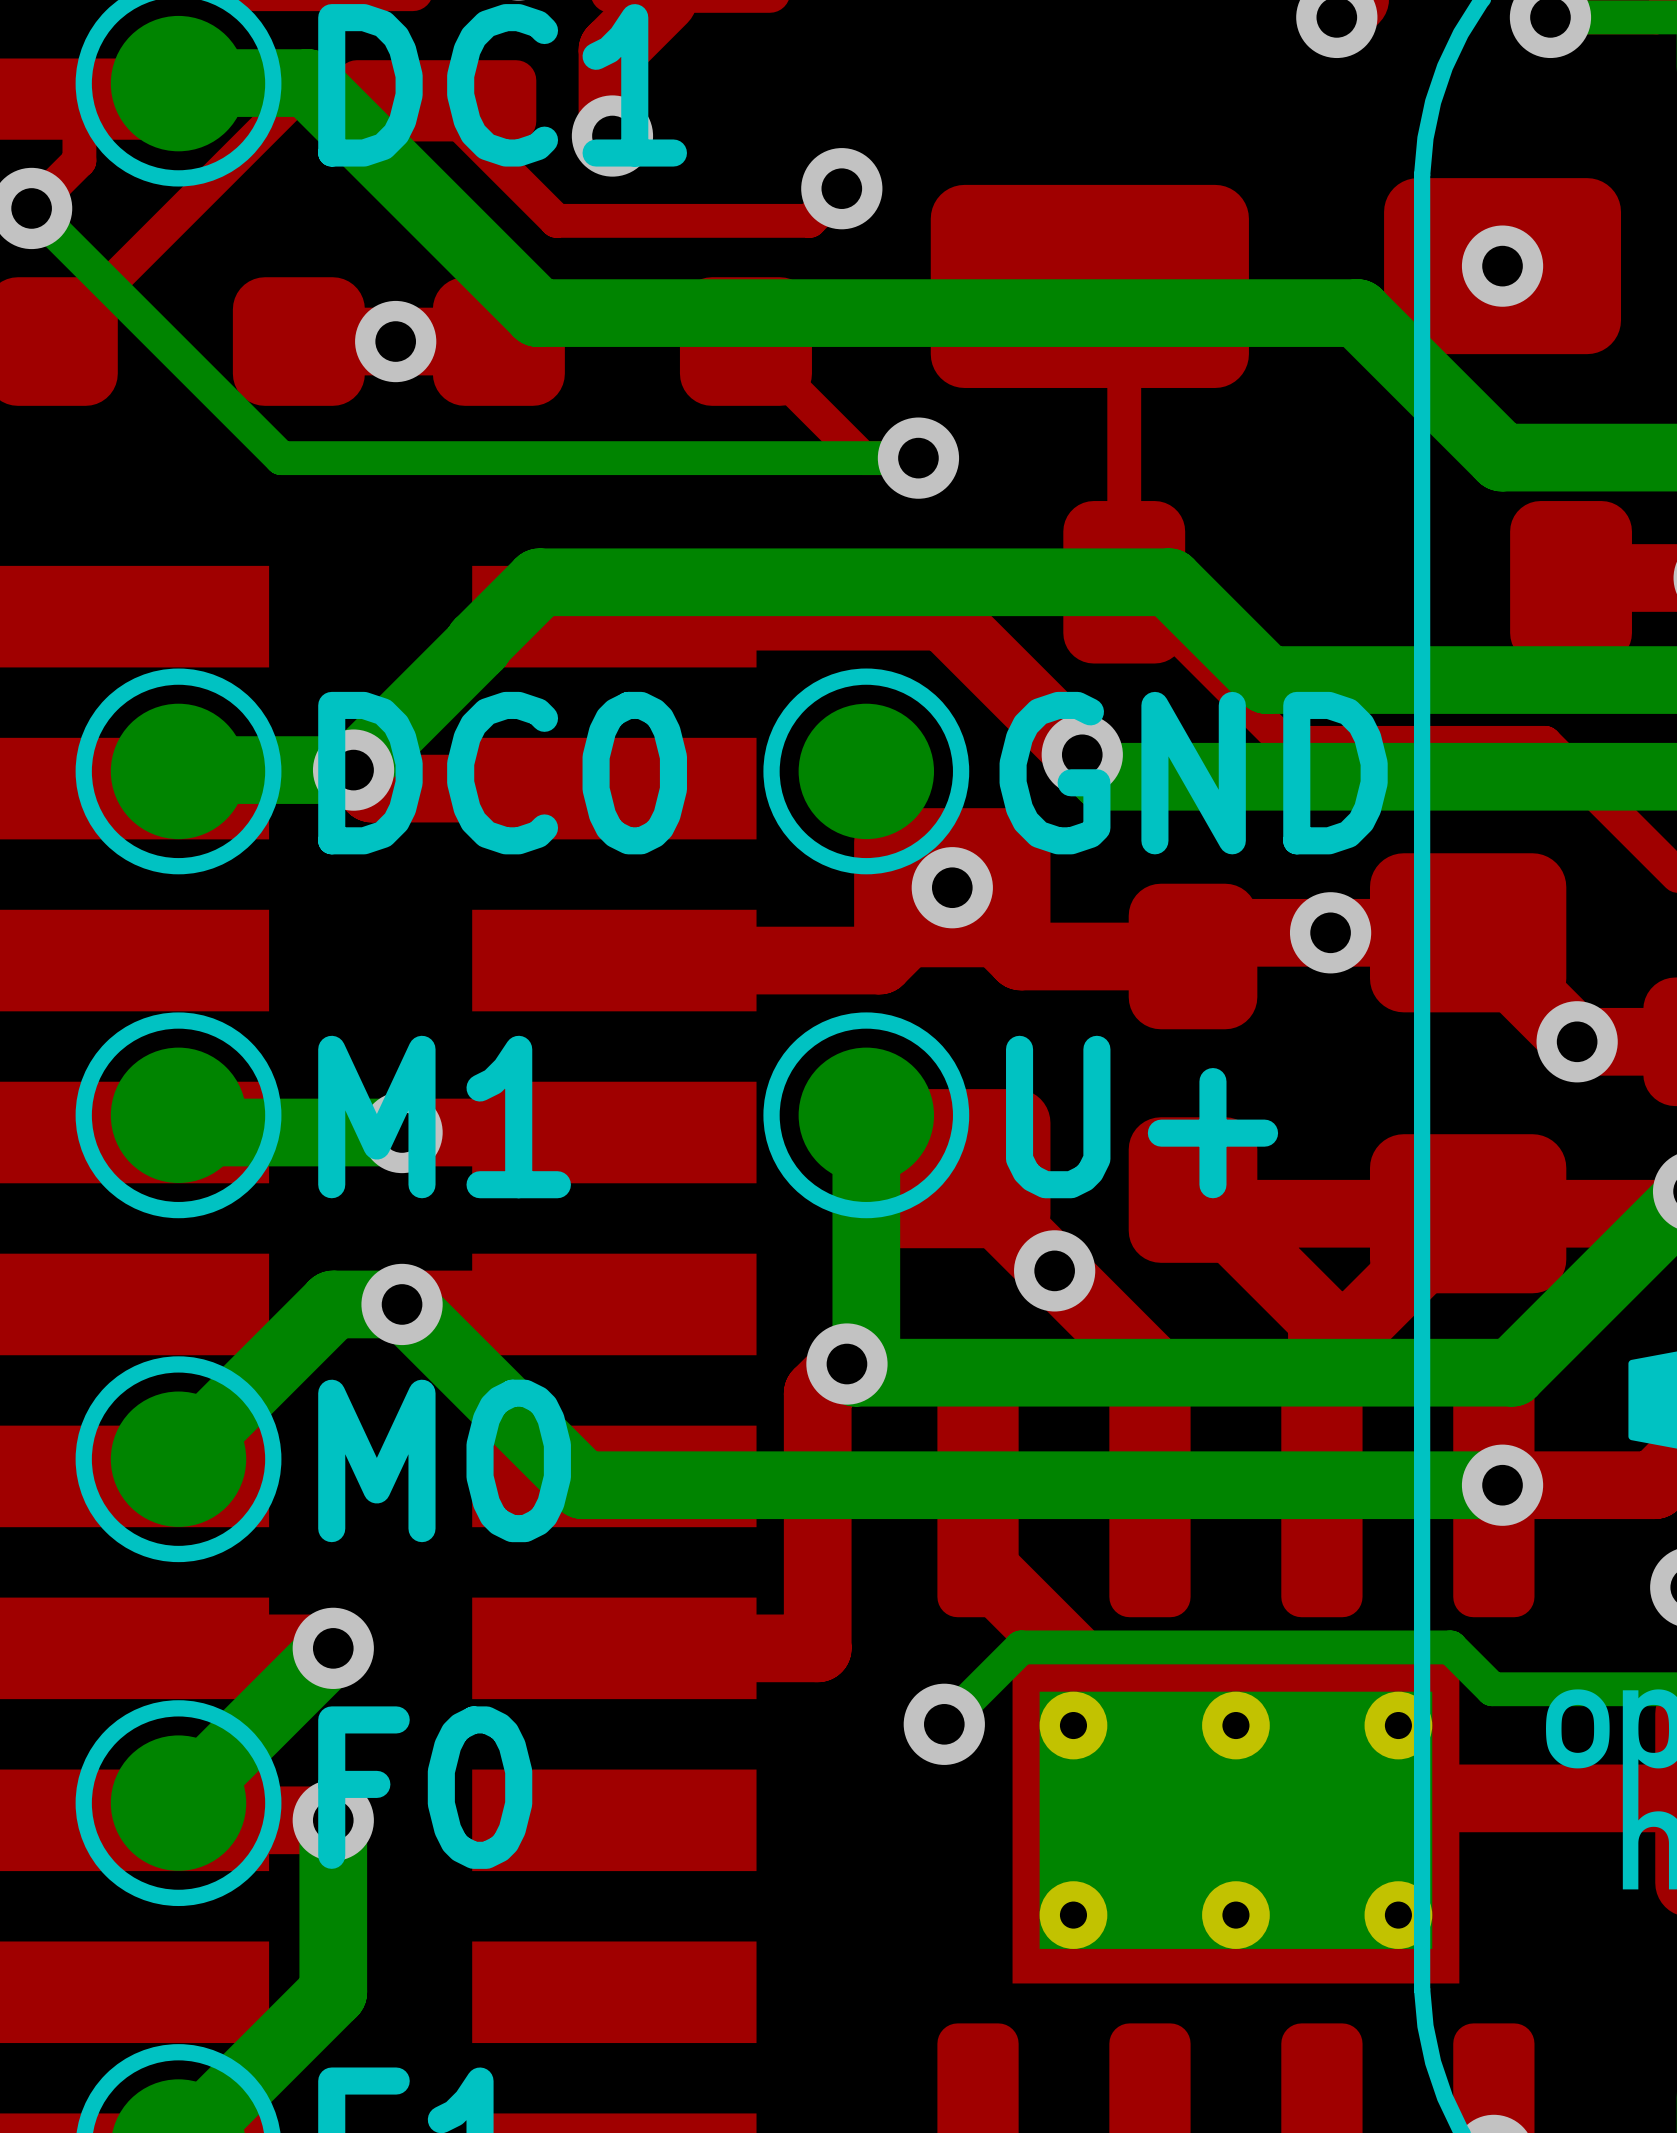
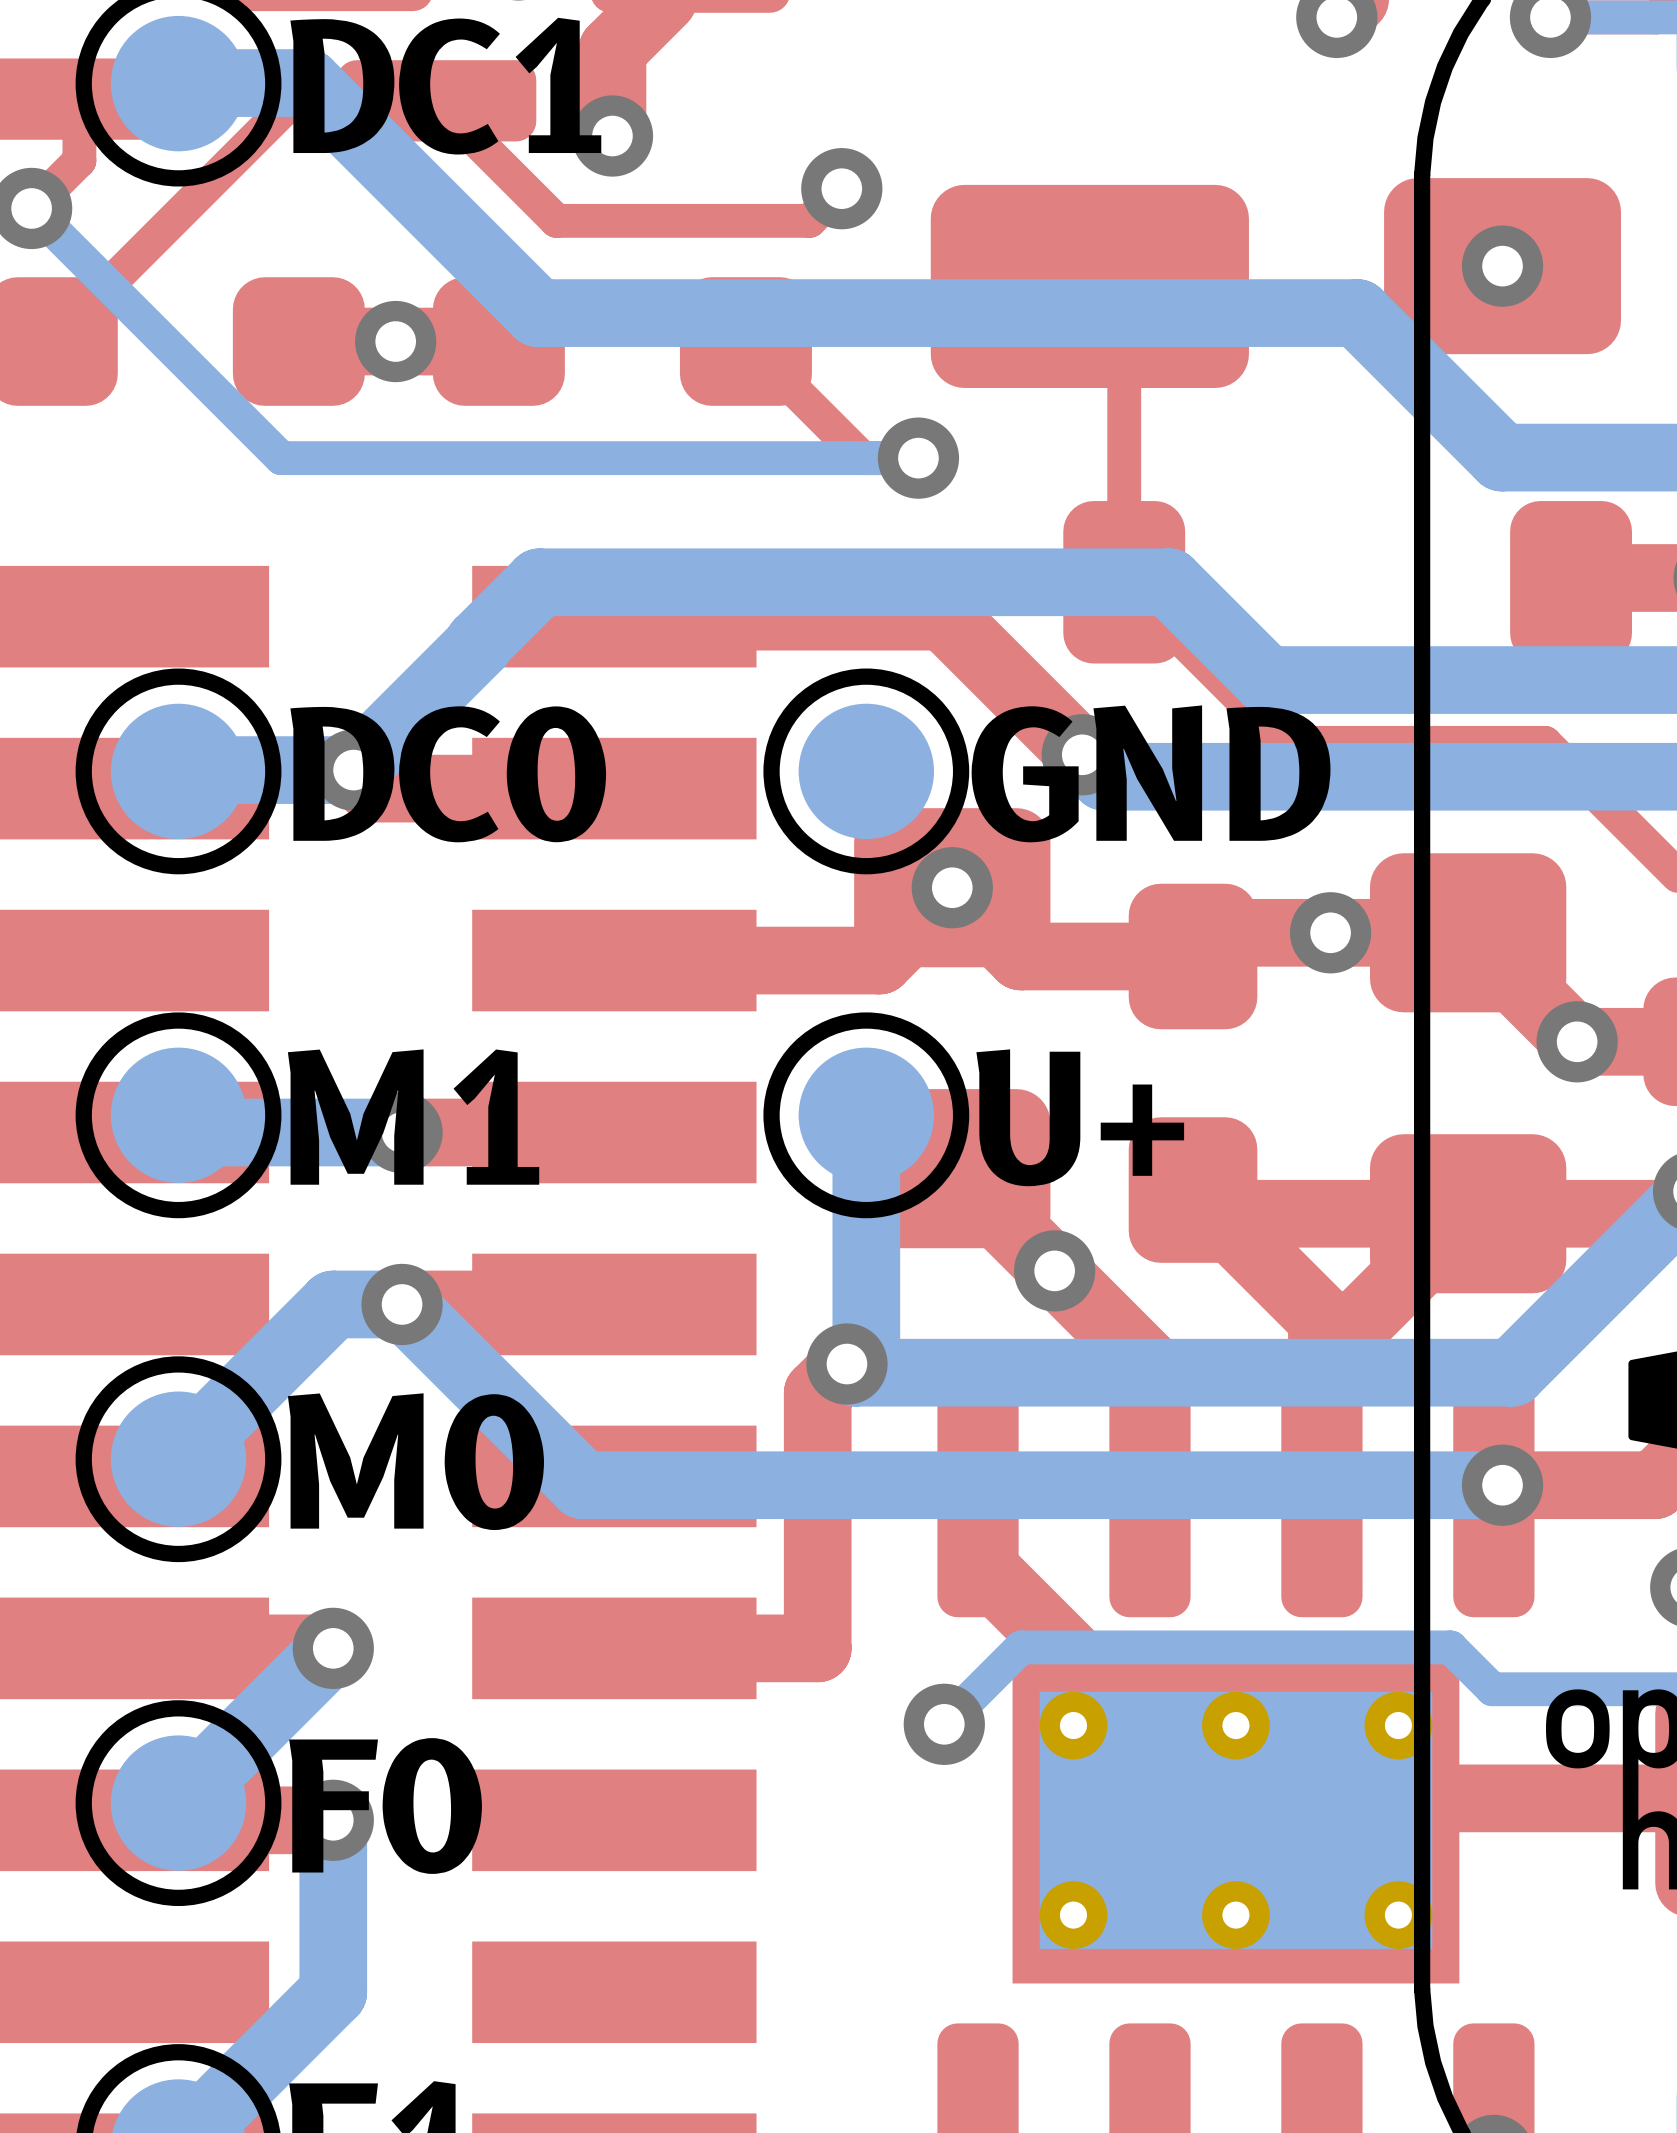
text position: F0 (425, 1787) -> F0 (385, 1806)

